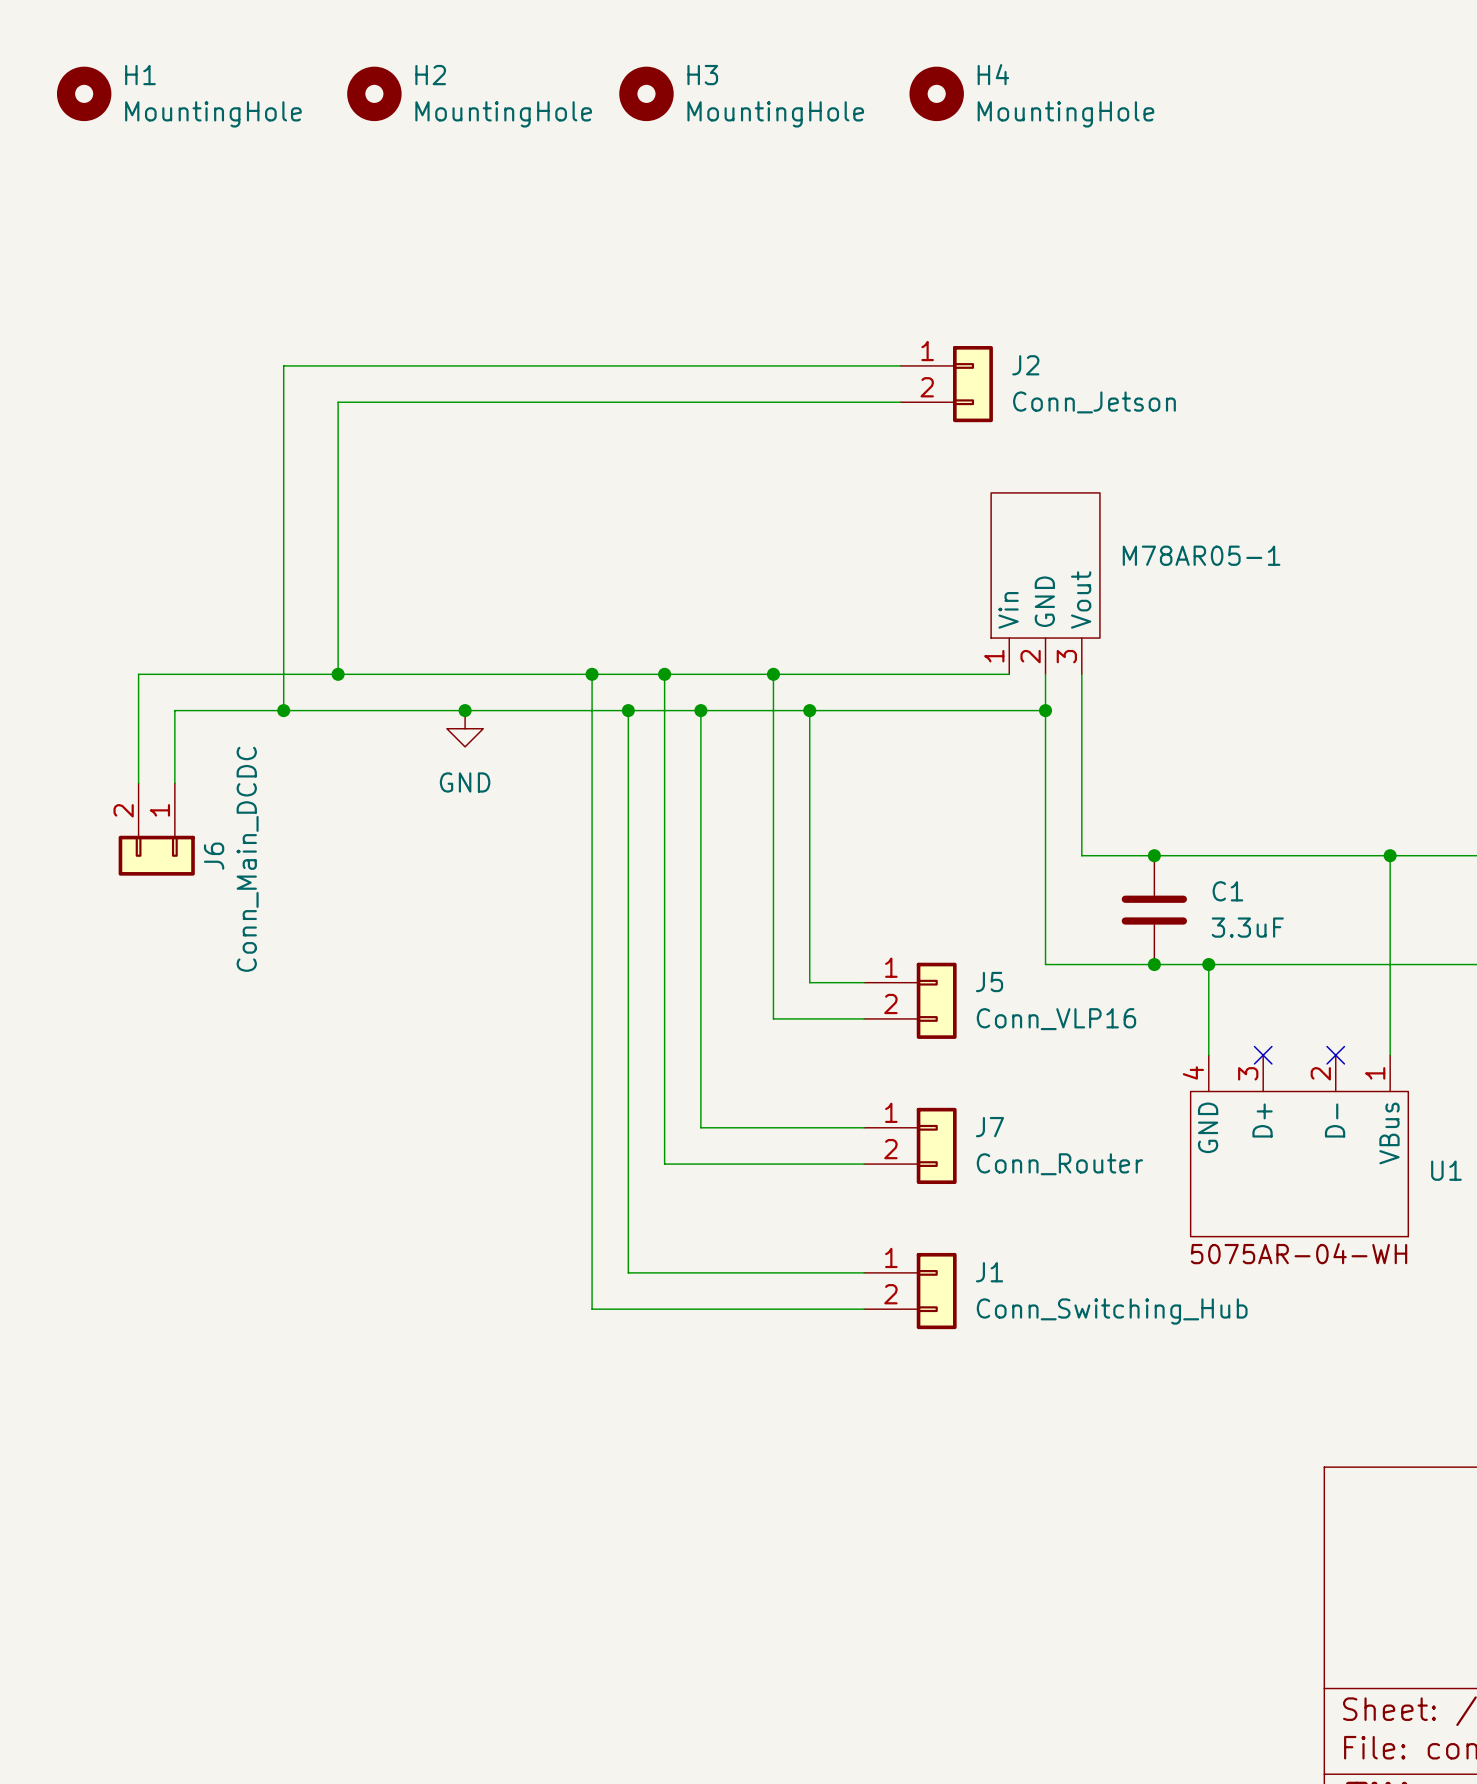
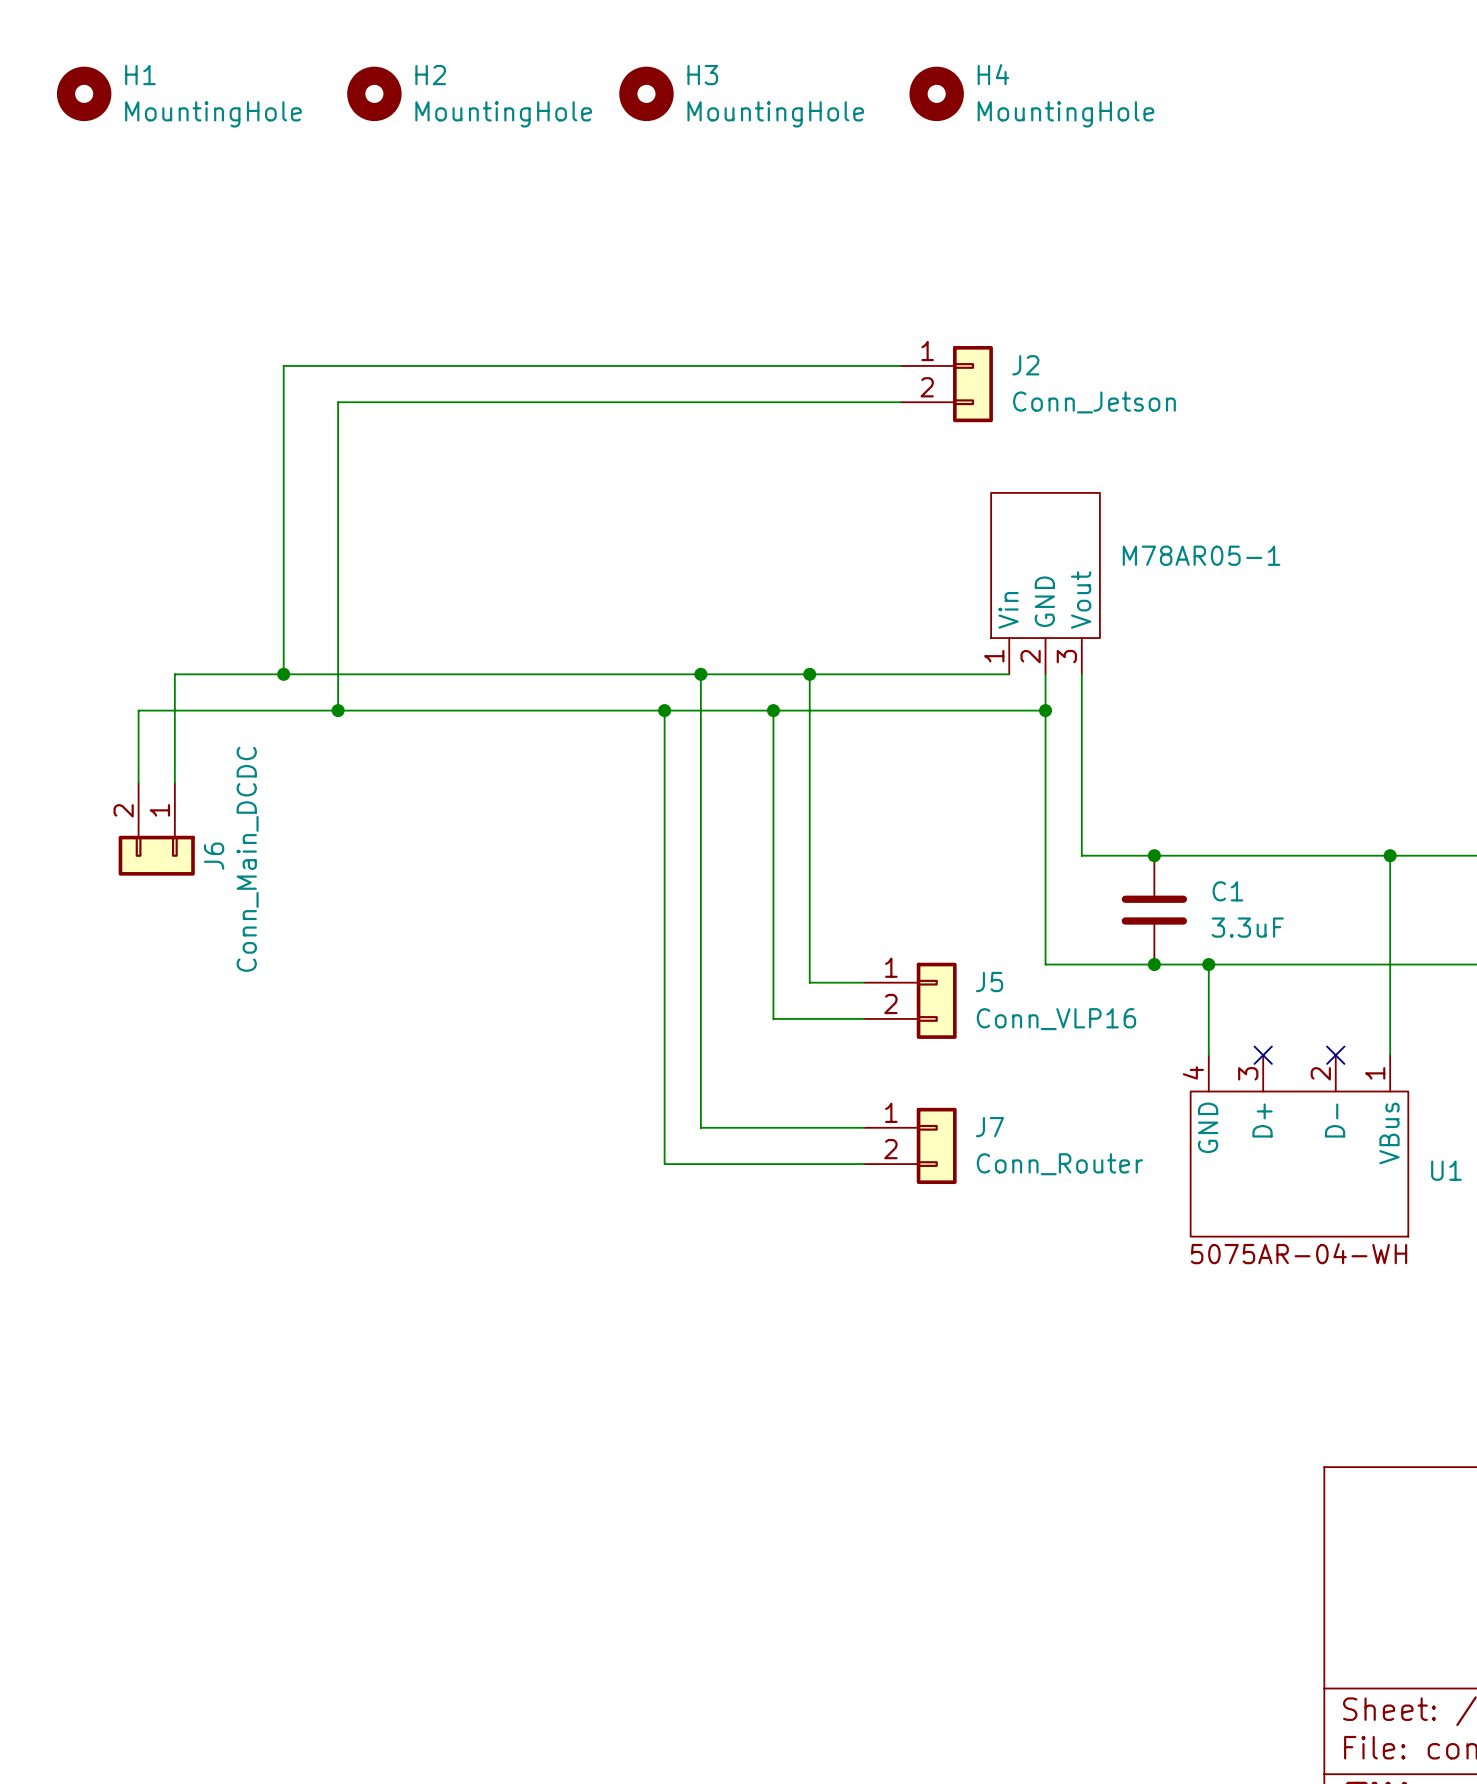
wire: (174, 674) (138, 674) (138, 710) -> (174, 674) (174, 710) (138, 710)
wire: (283, 674) (283, 710) -> (338, 674) (338, 710)
junction: none -> (283, 674)
junction: (338, 674) -> none
wire: (592, 674) (592, 1309) (864, 1309) -> none
junction: (592, 674) -> none
wire: (664, 674) (664, 710) -> (700, 674) (700, 710)
junction: (664, 674) -> none
junction: none -> (700, 674)
wire: (773, 674) (773, 710) -> (809, 674) (809, 710)
junction: (773, 674) -> none
junction: none -> (809, 674)
junction: (283, 710) -> none
junction: none -> (338, 710)
junction: (465, 710) -> none
wire: (628, 710) (628, 1272) (864, 1272) -> none
junction: (628, 710) -> none
junction: none -> (664, 710)
junction: (700, 710) -> none
junction: none -> (773, 710)
junction: (809, 710) -> none
power symbol: GND (465, 728) -> none
J1: Conn_Switching_Hub (910, 1291) -> none

